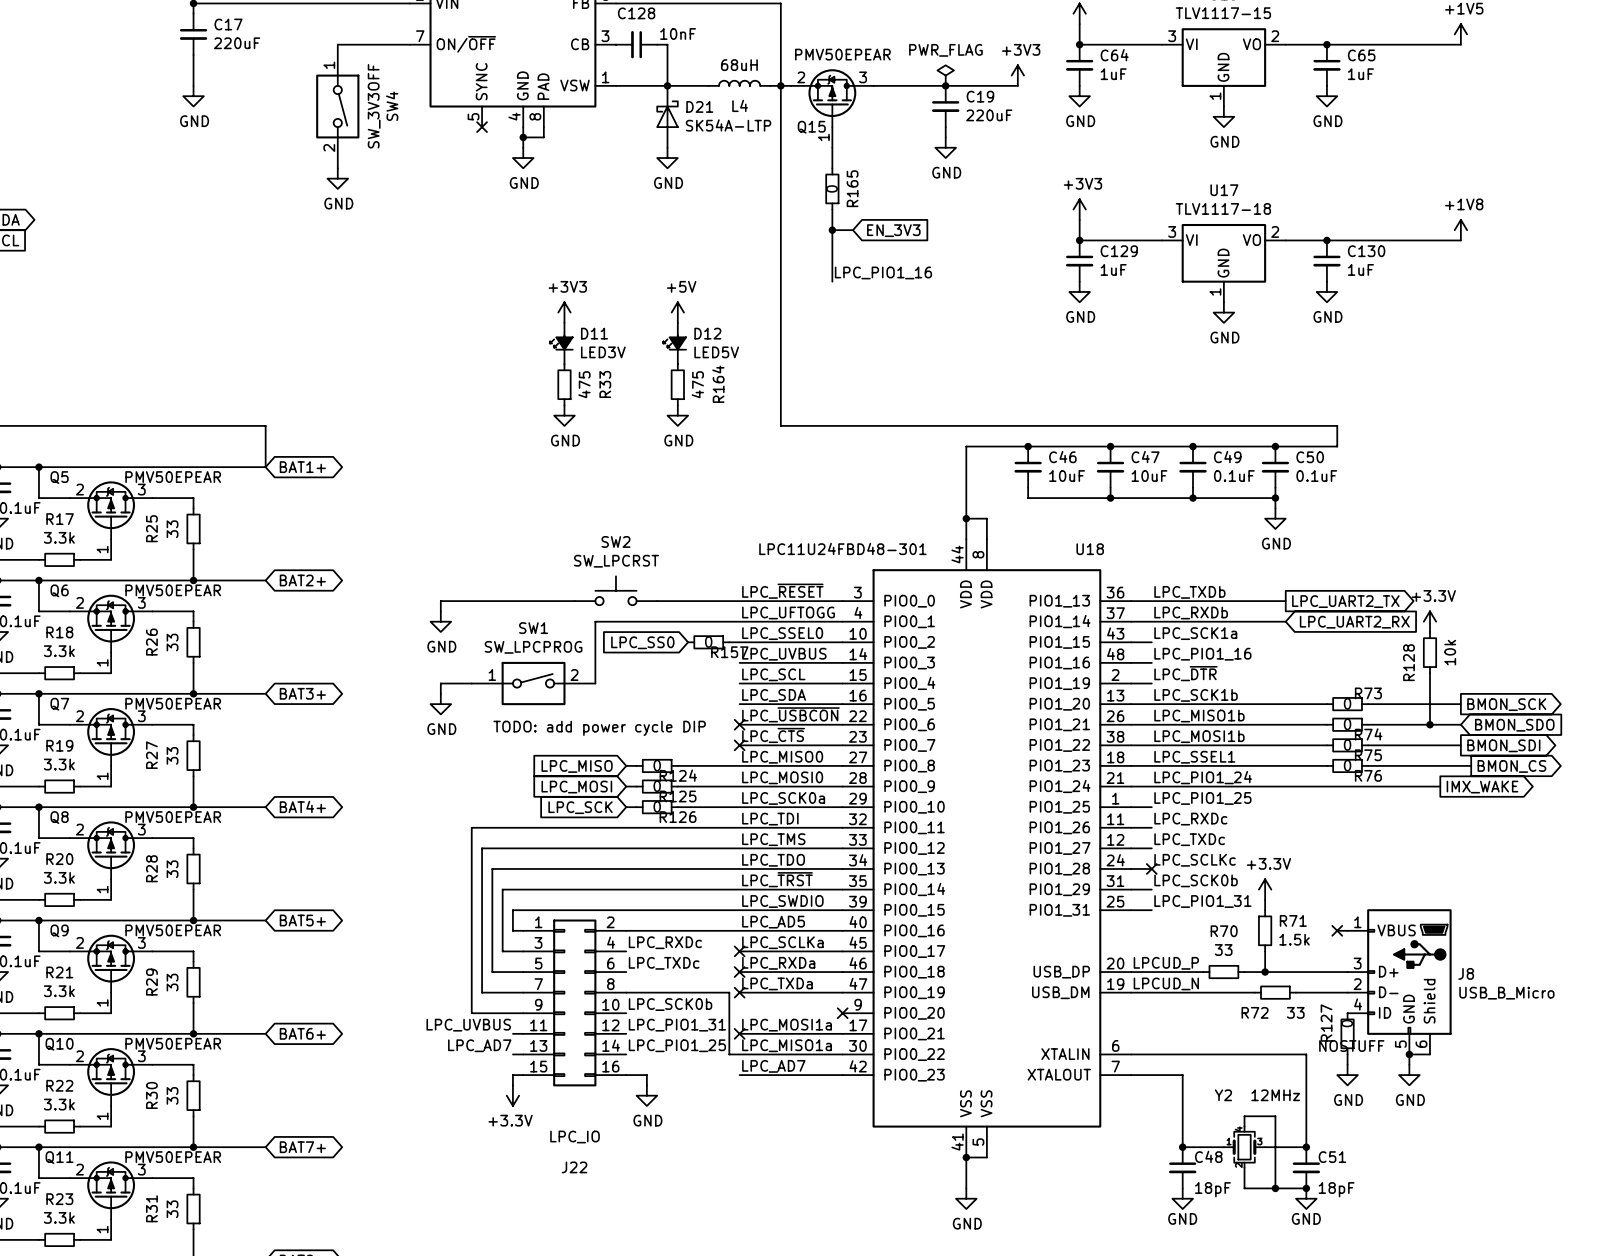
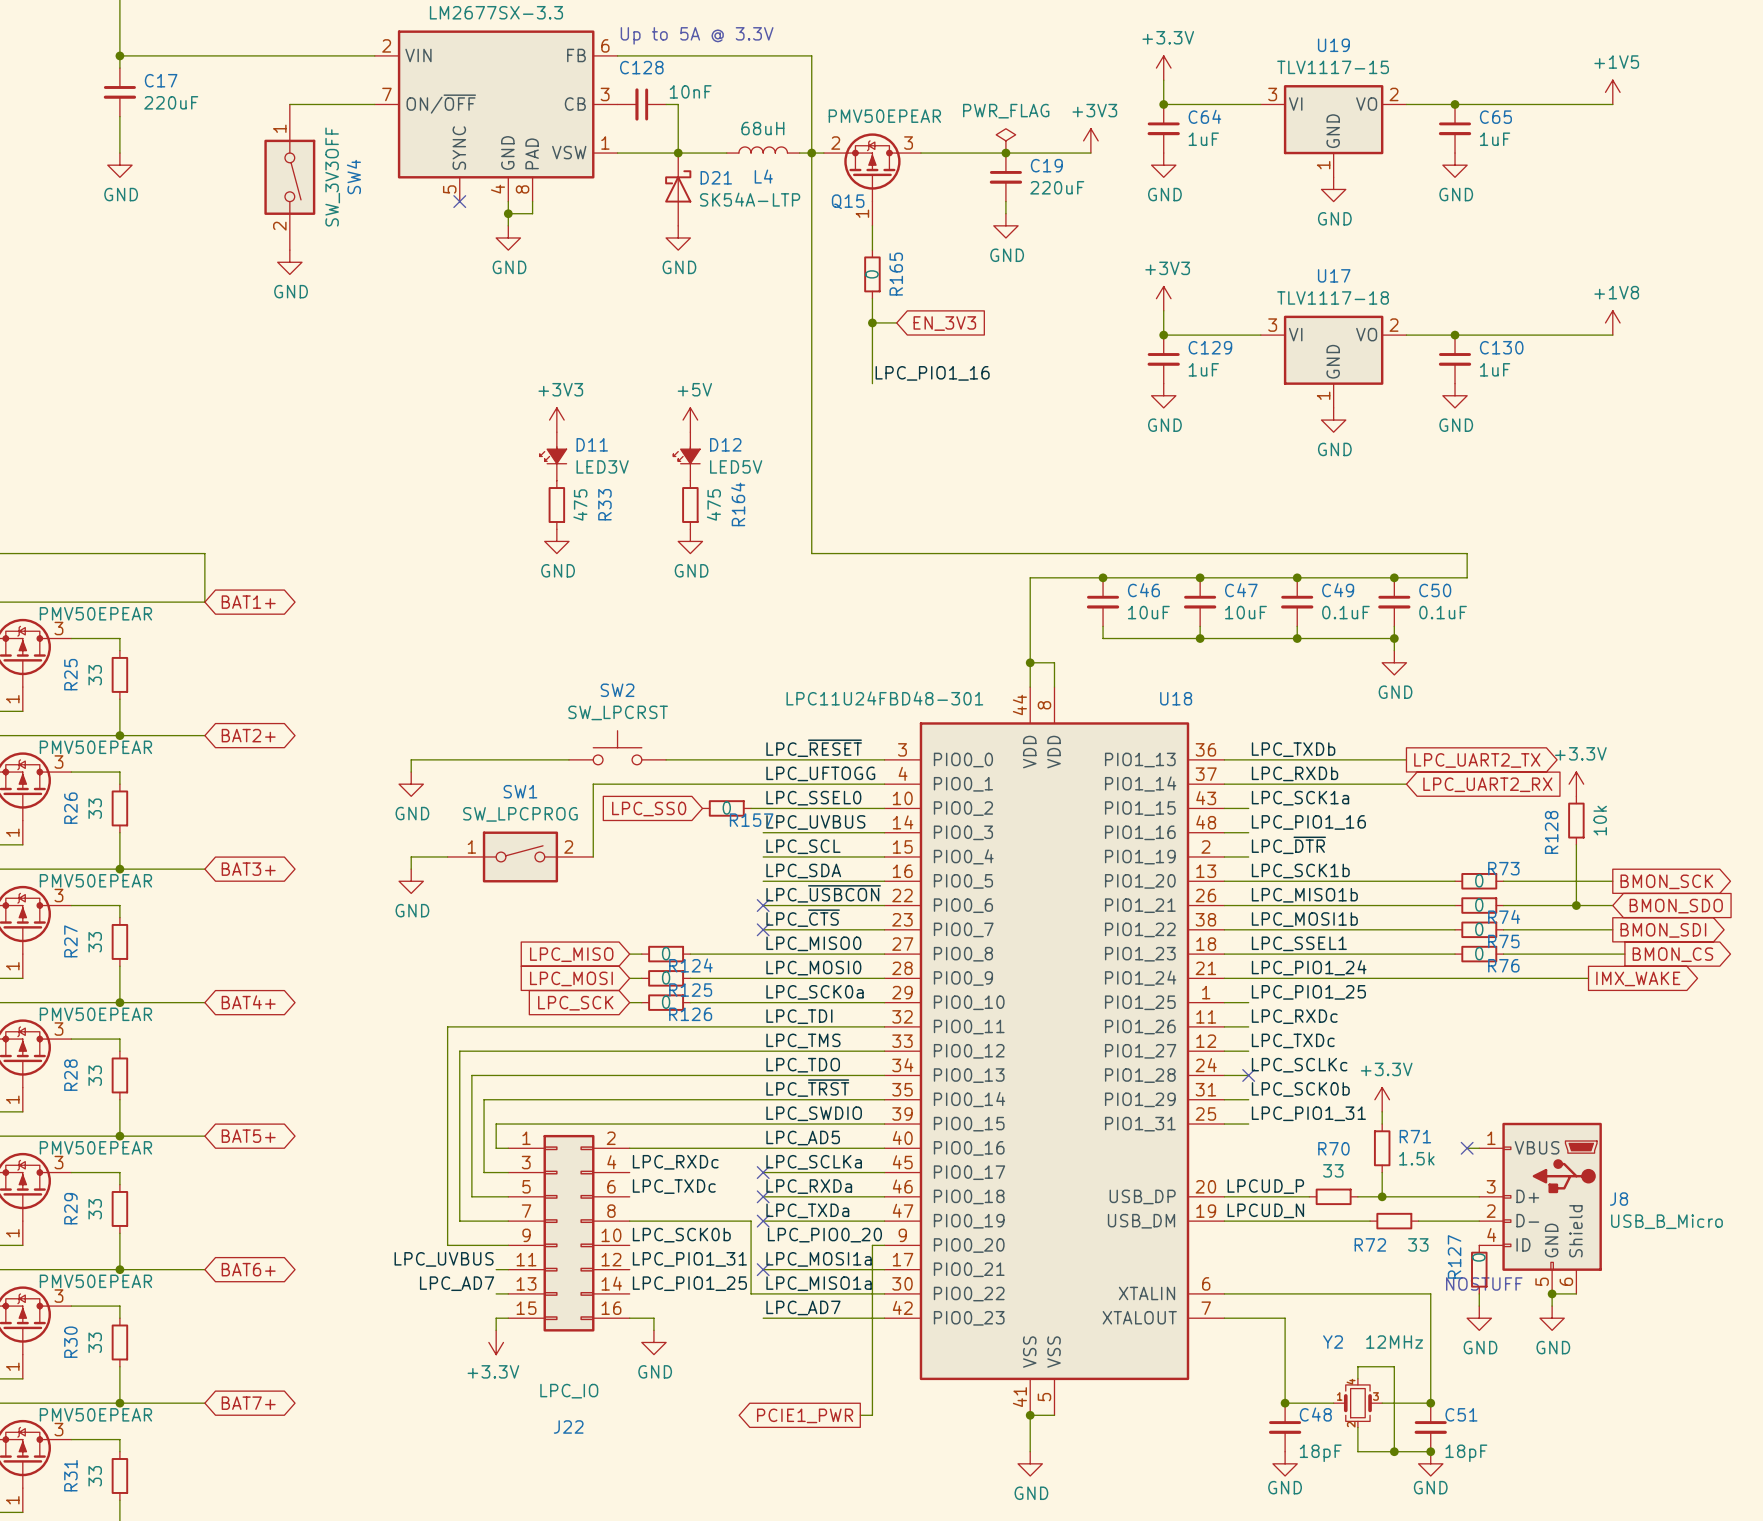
text: TODO: add power cycle DIP (599, 728) -> none
label: none -> LPC_PIO0_20 (824, 1235)
wire: none -> (884, 1245) (872, 1245) (872, 1415) (860, 1415)
no-connect mark: (842, 1013) -> none
global label: none -> PCIE1_PWR (805, 1415)

